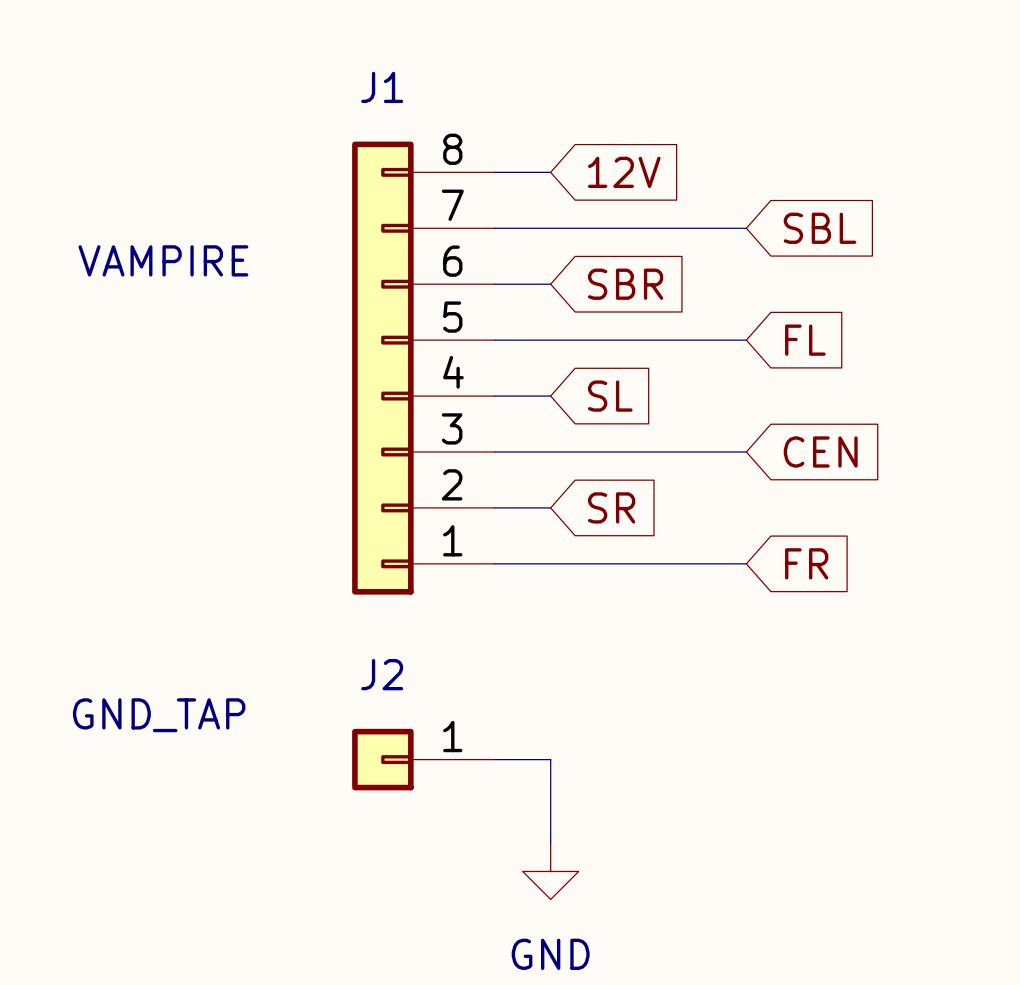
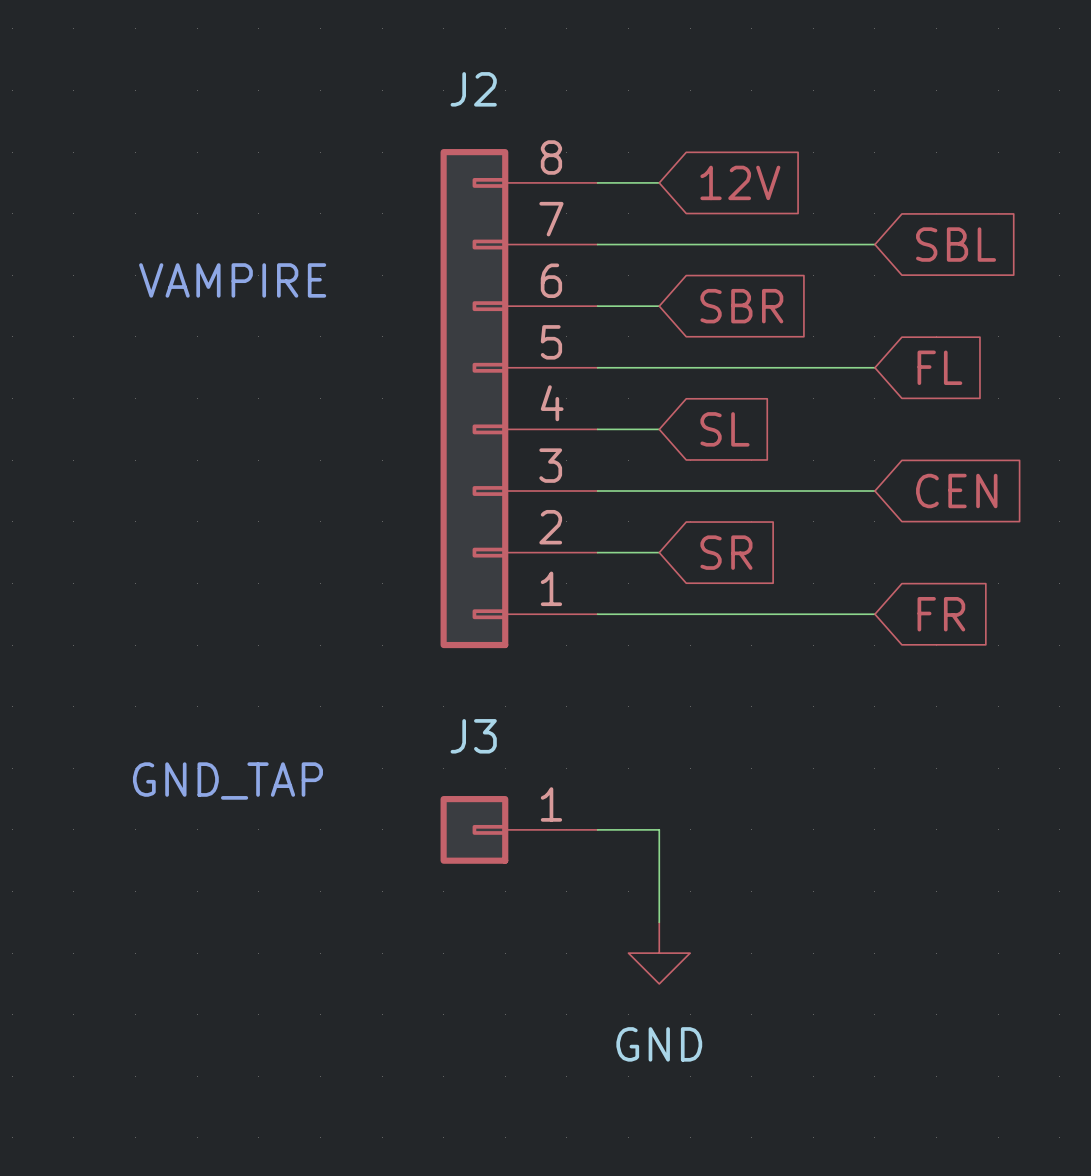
J1 name: J1 (382, 87) -> J2 (473, 89)
J2 name: J2 (382, 674) -> J3 (473, 736)

